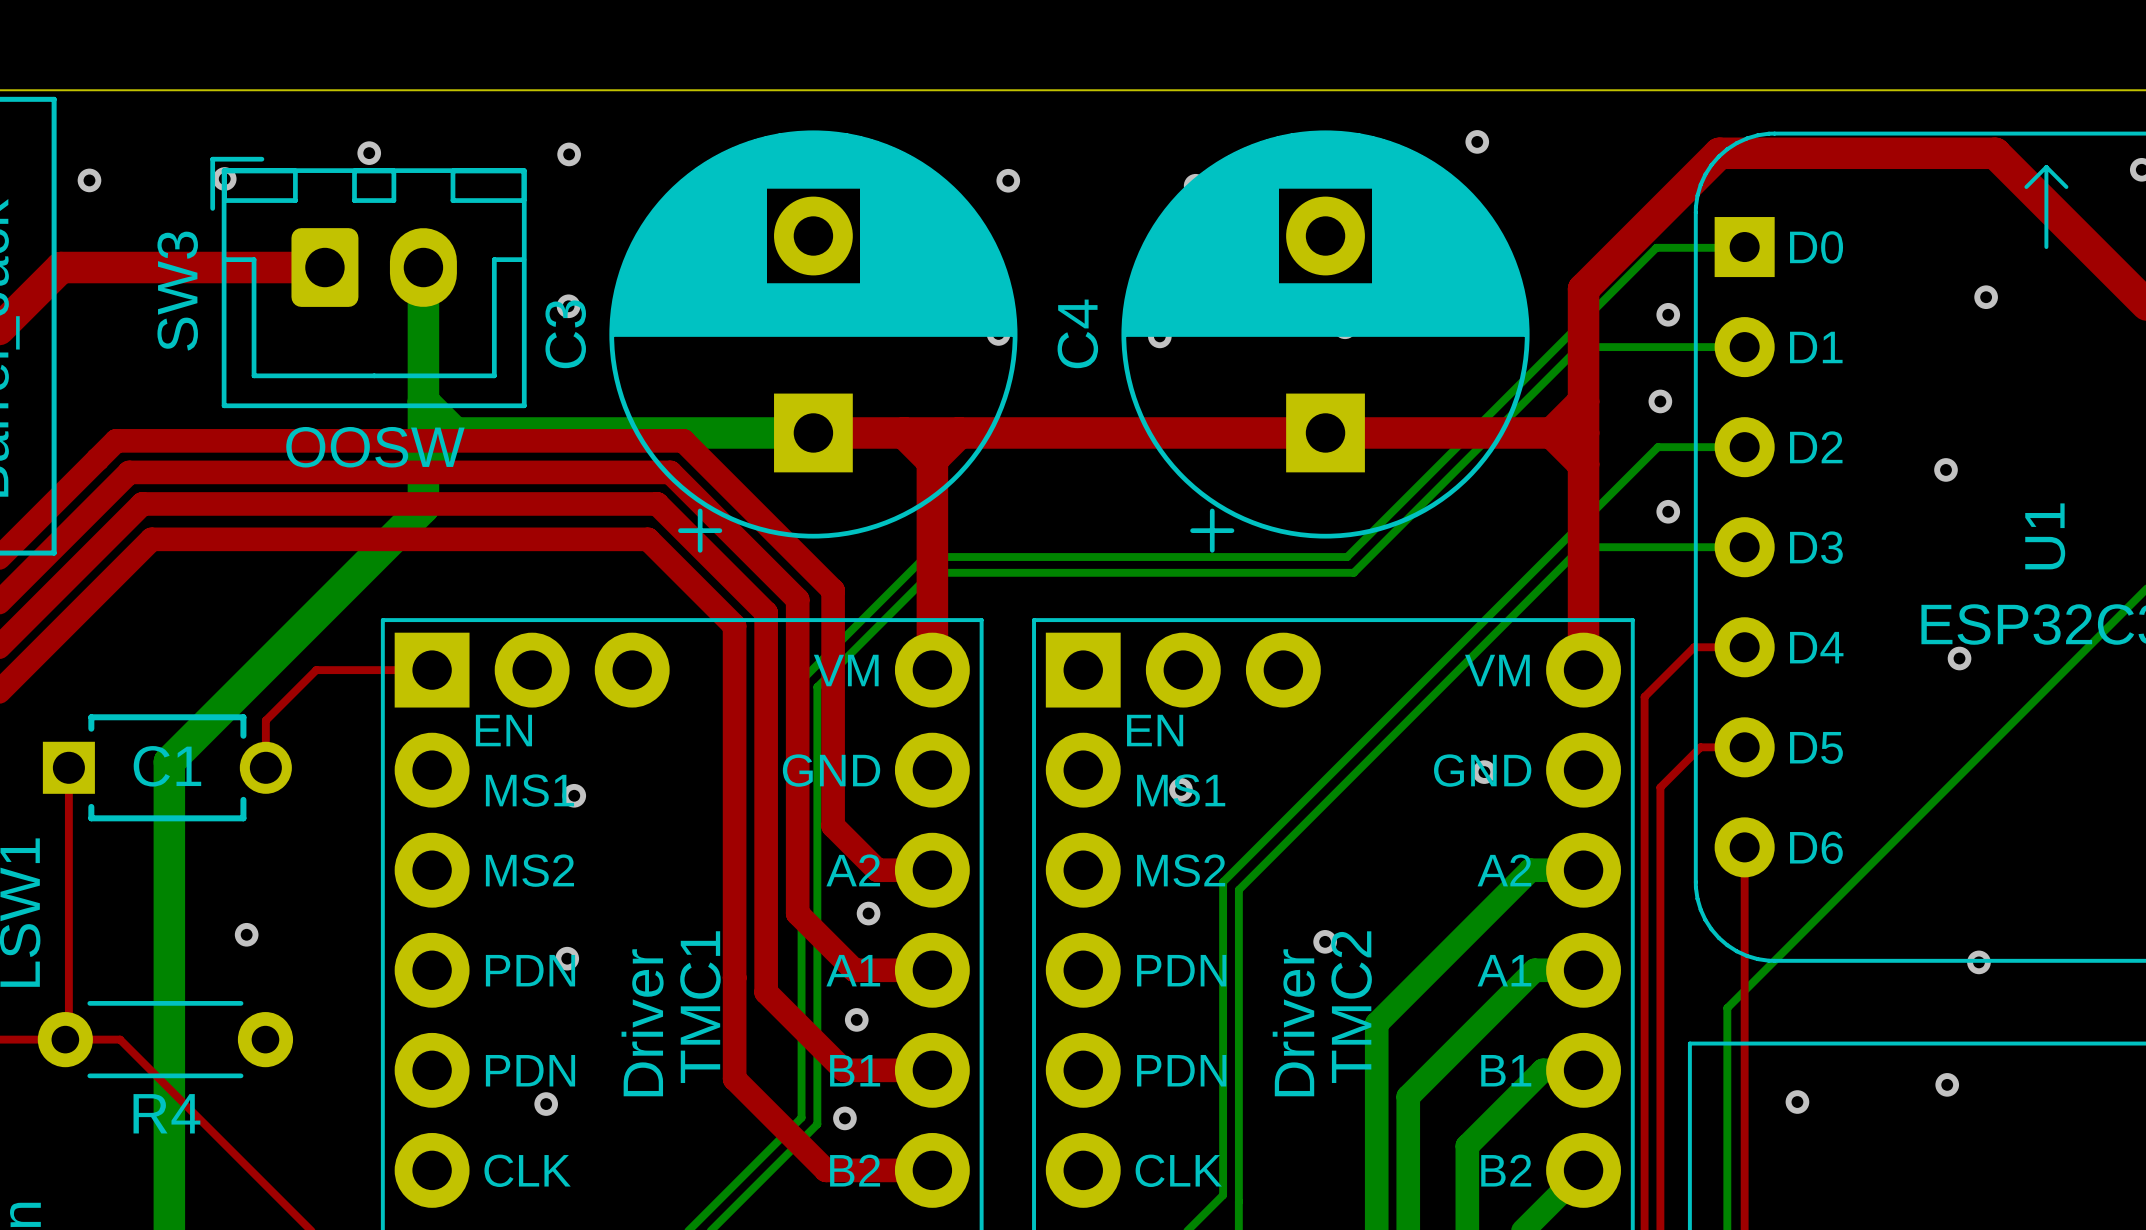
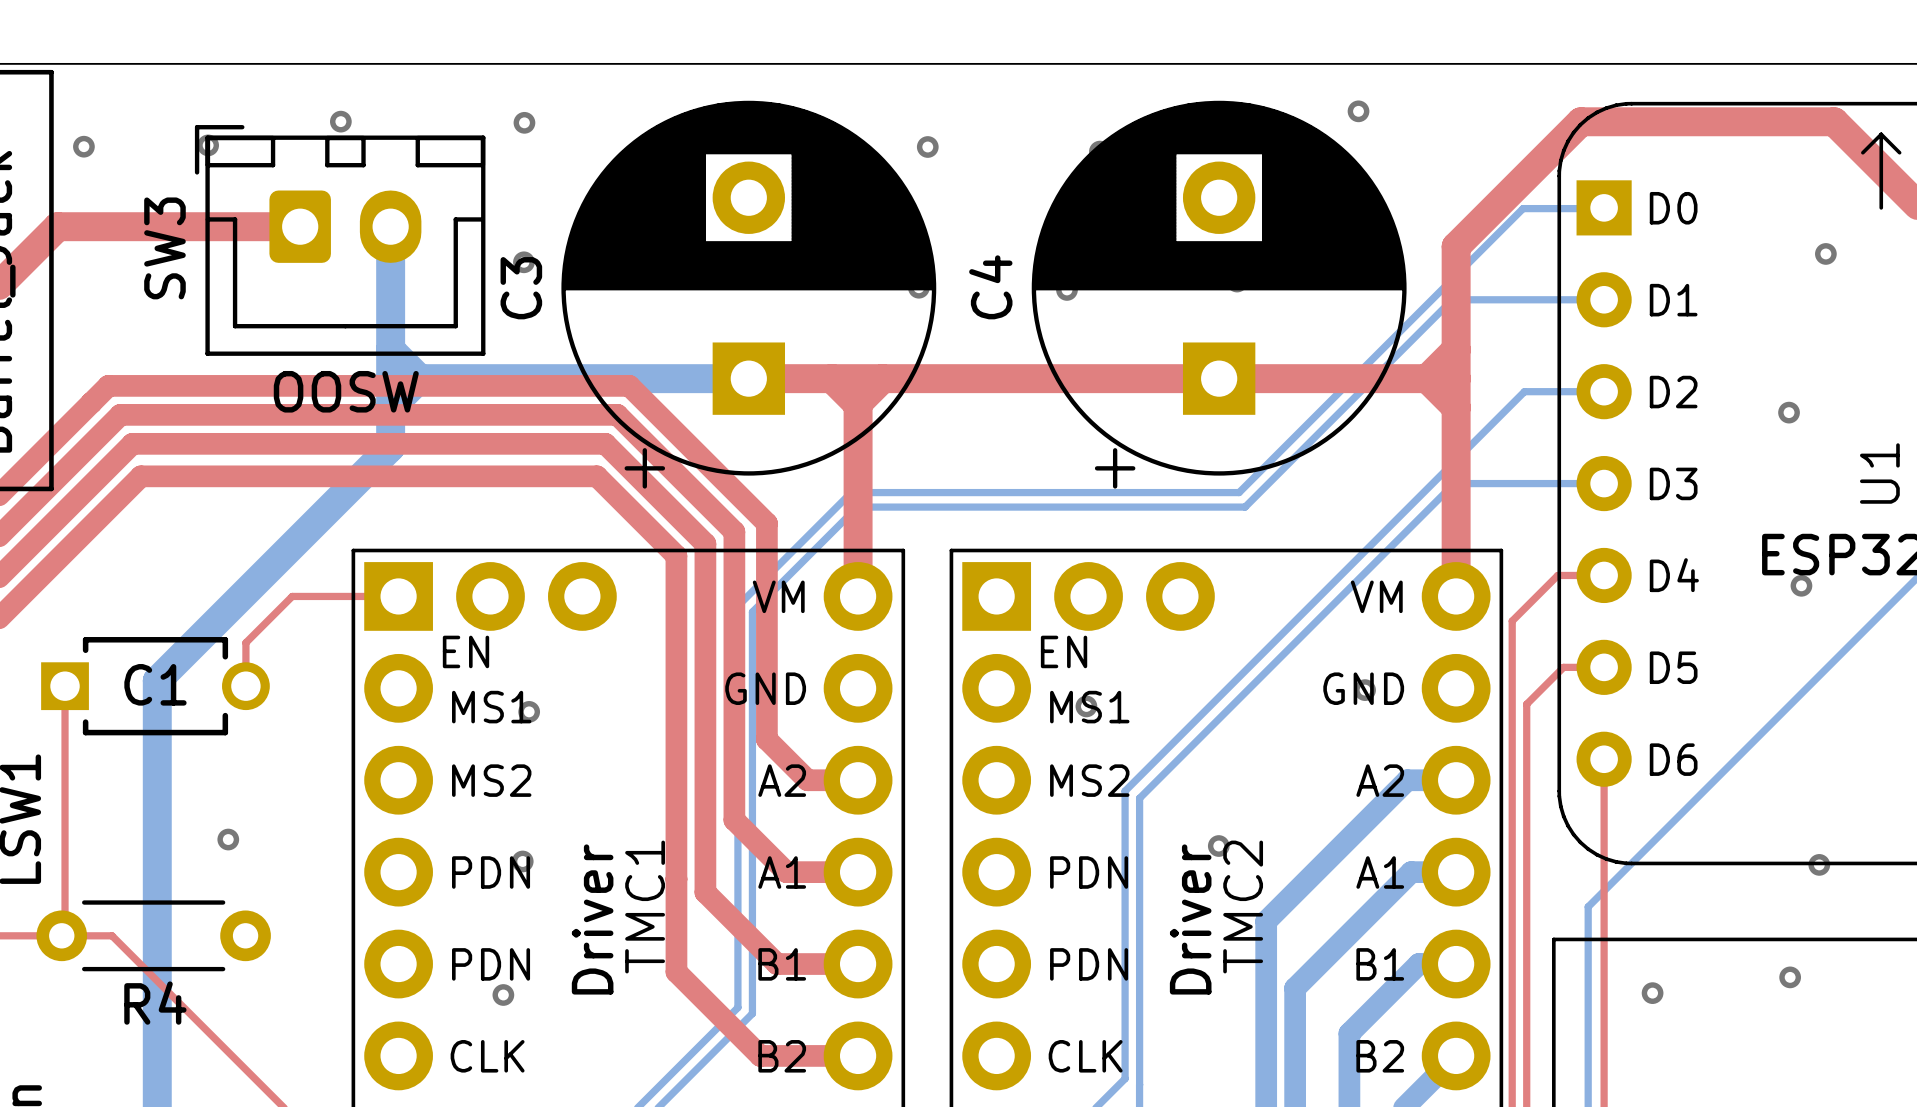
via: (1668, 314) -> none
via: (1660, 401) -> none
via: (1668, 511) -> none
via: (868, 913) -> none
via: (856, 1019) -> none
via: (844, 1118) -> none

